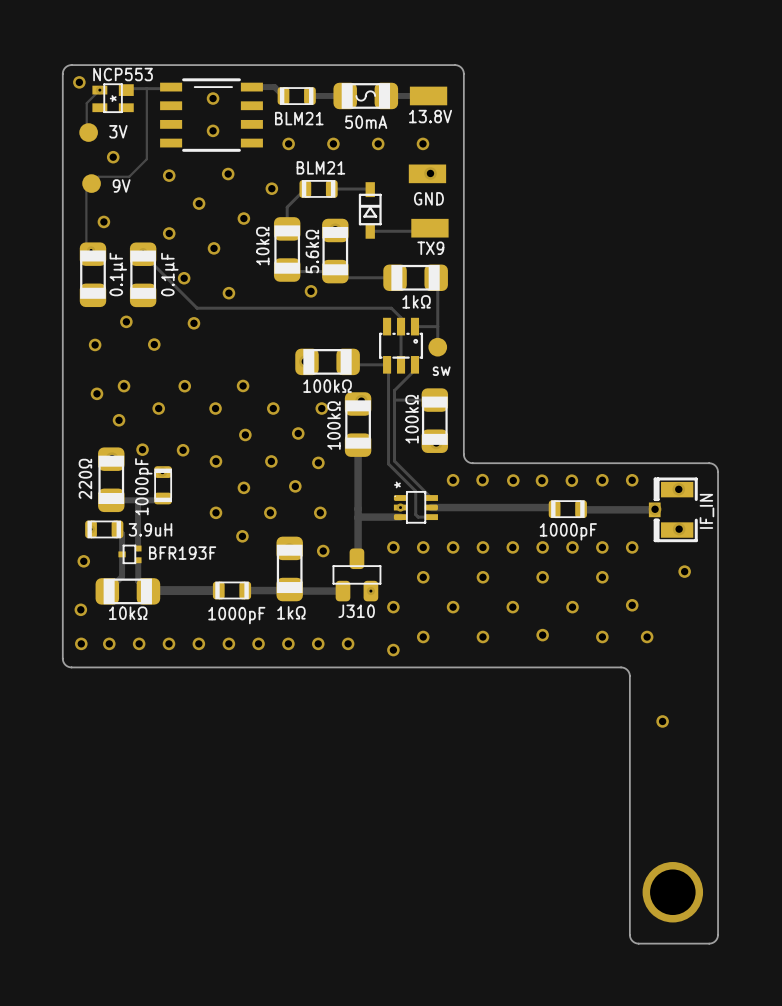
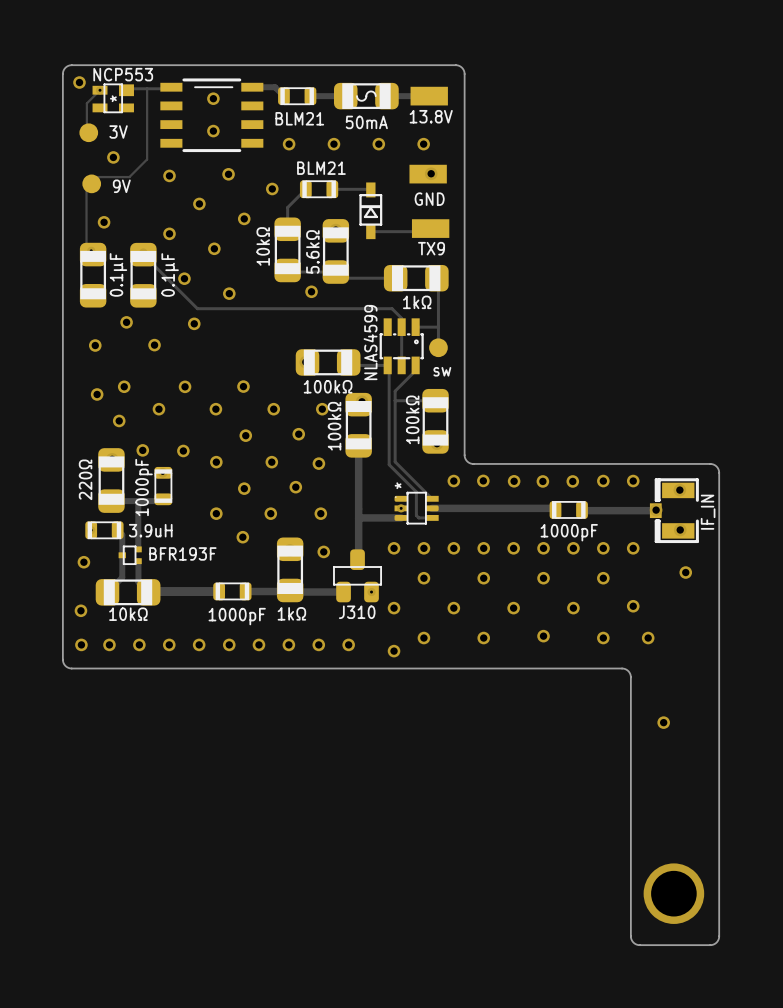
part value: none -> NLAS4599 (370, 342)

